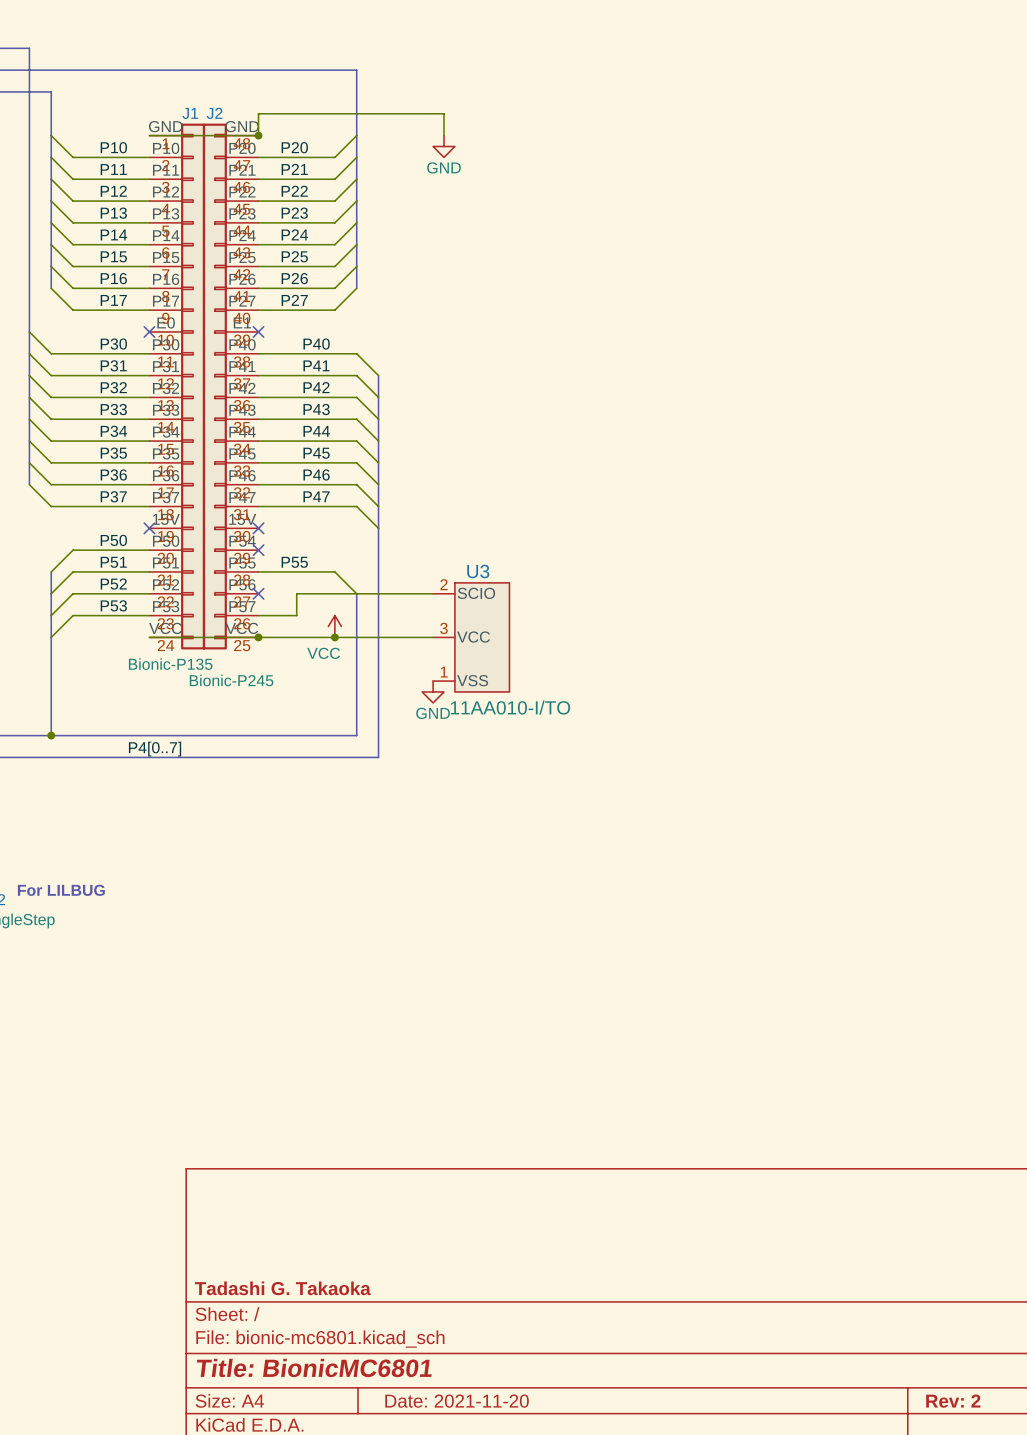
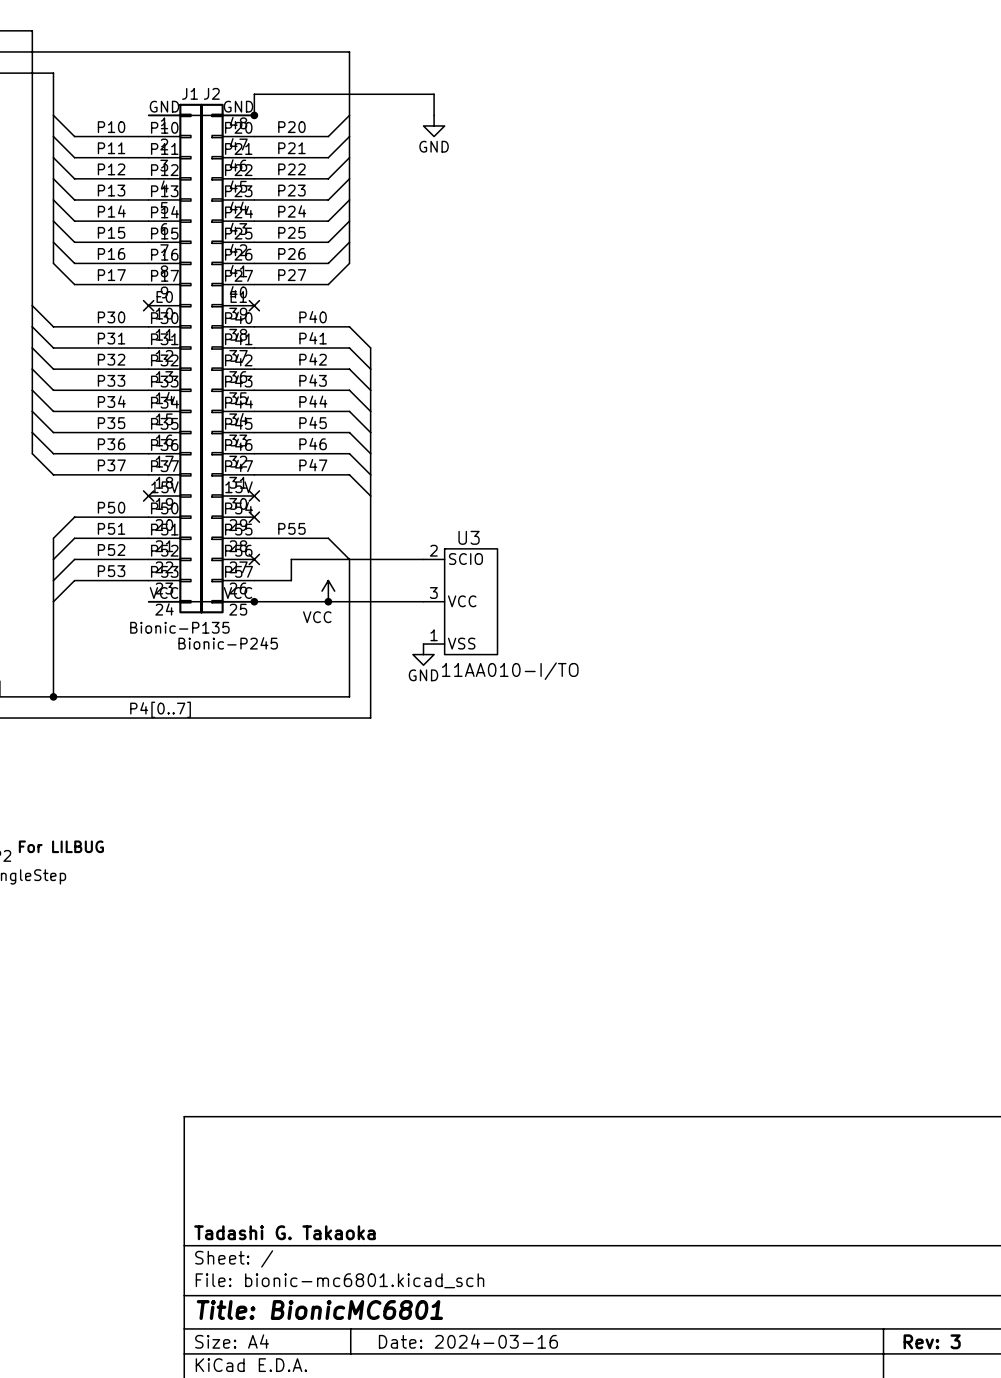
title block: Date: 2021-11-20 (457, 1401) -> Date: 2024-03-16 (468, 1341)
title block: Rev: 2 (953, 1401) -> Rev: 3 (932, 1341)

